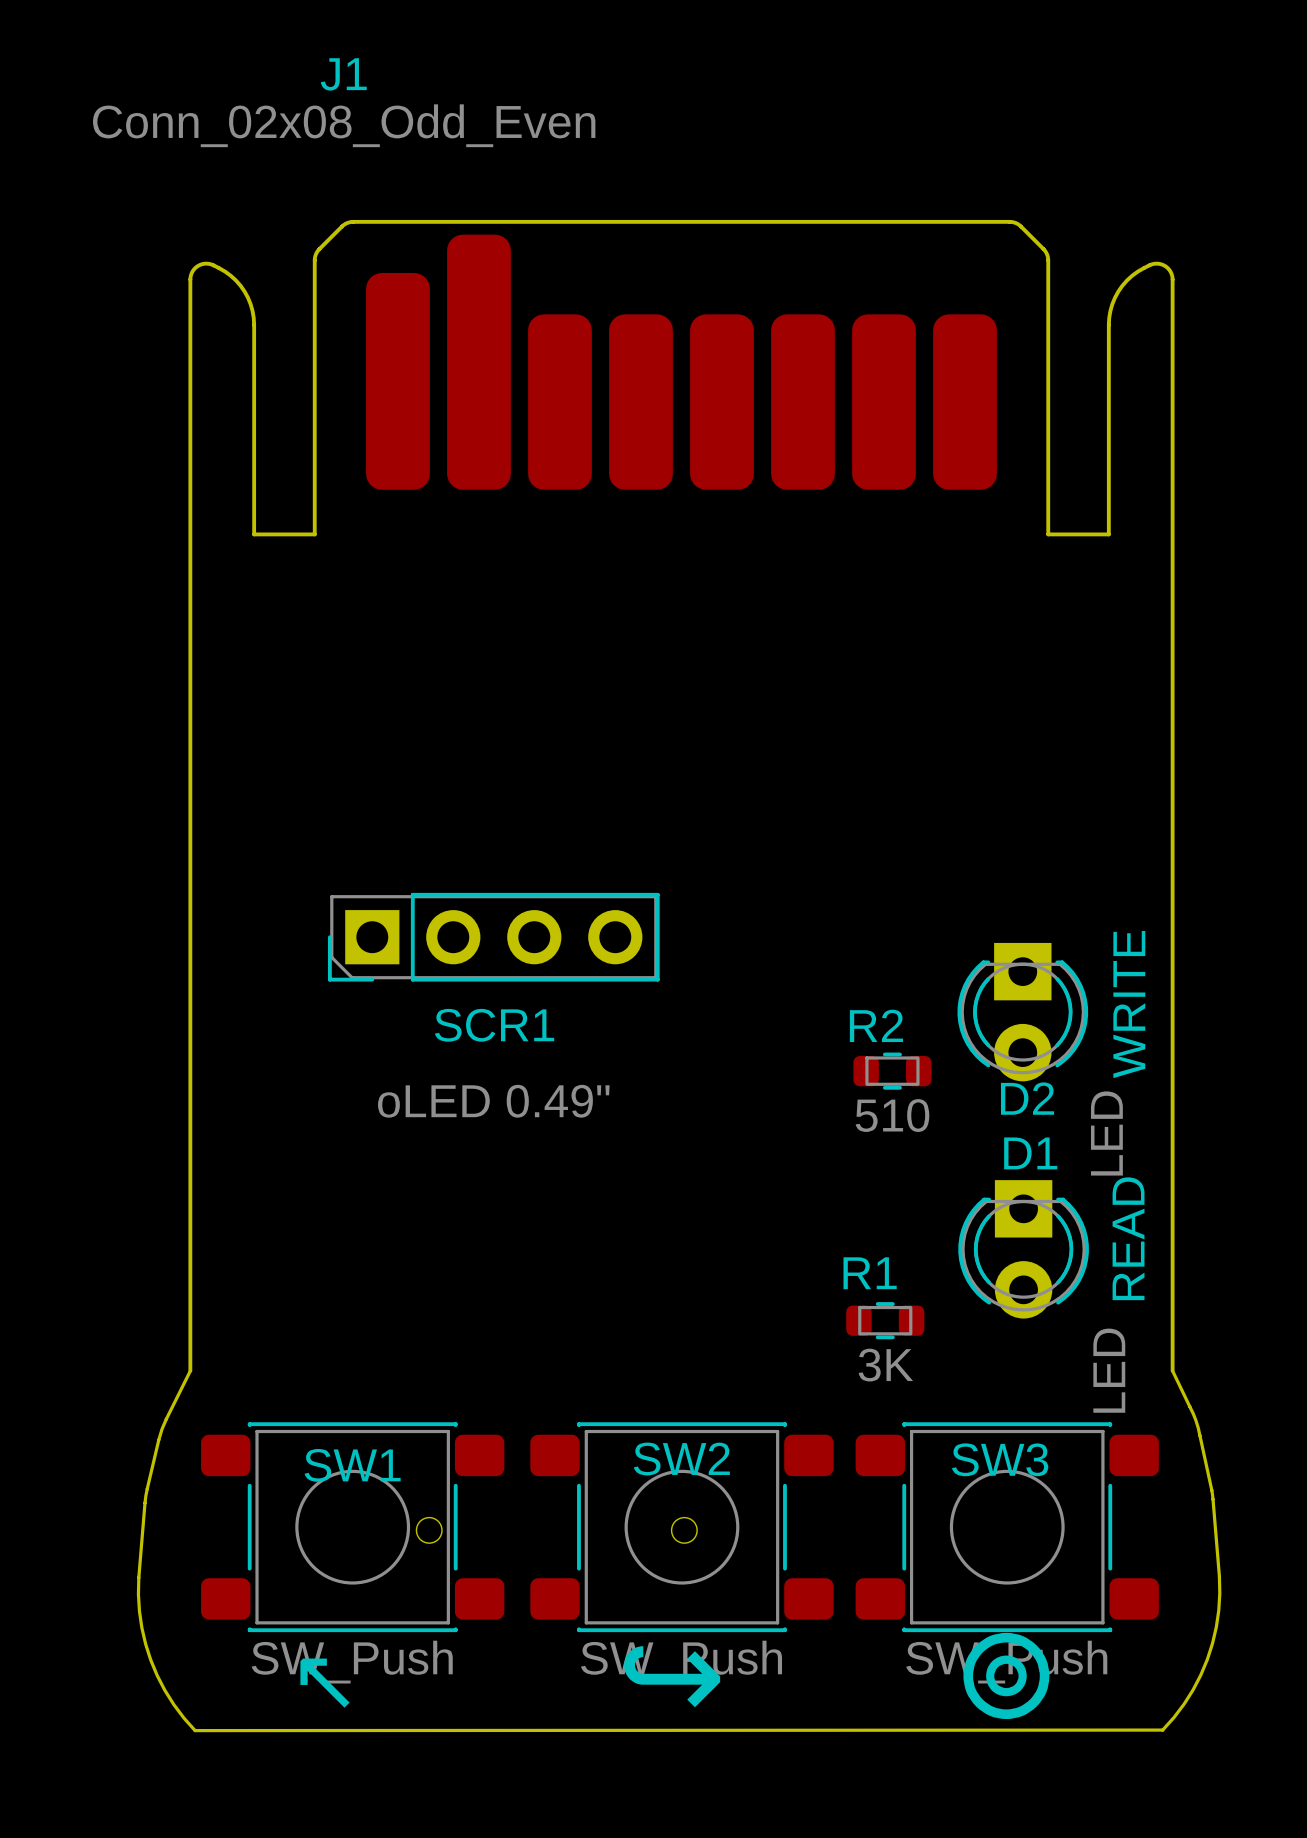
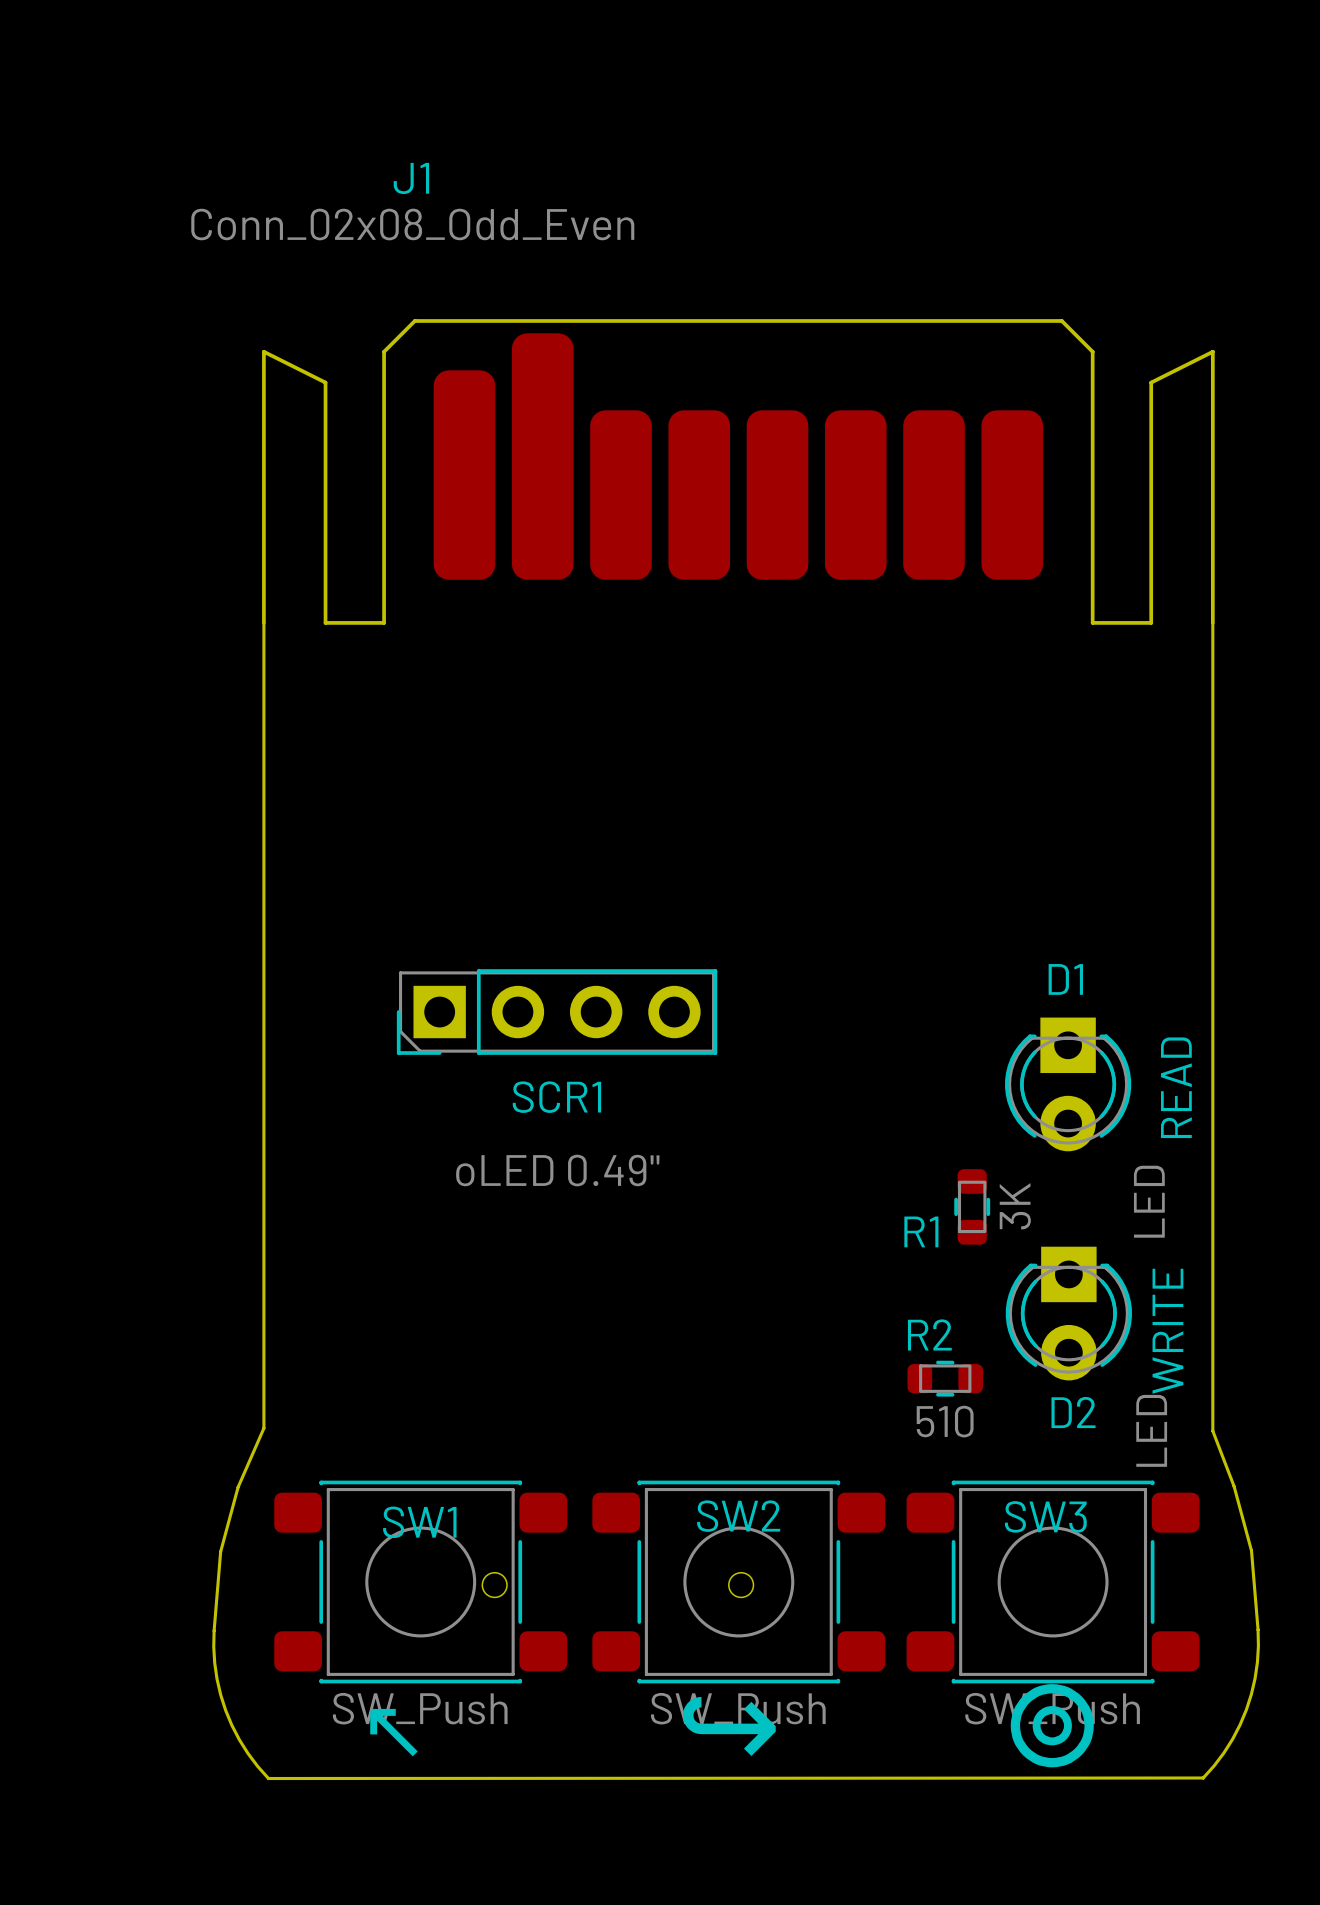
J1 footprint: [188, 219, 1175, 1373] -> [262, 319, 1215, 625]
text: WRITE (1129, 1004) -> READ (1176, 1087)
R2 position: (892, 1071) -> (945, 1378)
D2 name: D2 (1027, 1098) -> D1 (1065, 979)
D1 name: D1 (1030, 1153) -> D2 (1073, 1412)
text: READ (1128, 1238) -> WRITE (1167, 1331)
R1 name position: R1 (870, 1273) -> R1 (921, 1231)
R1 rotation: 0° (885, 1320) -> 90° clockwise (972, 1206)
R1 position: (885, 1320) -> (972, 1206)
R1 value position: 3K (885, 1365) -> 3K (1015, 1206)
board edge: (190, 1370) (161, 1429) (145, 1502) -> (263, 622) (263, 1428) (238, 1487) (220, 1558)
board edge: (1172, 1370) (1196, 1420) (1213, 1499) -> (1212, 622) (1212, 1431) (1234, 1486) (1251, 1555)

